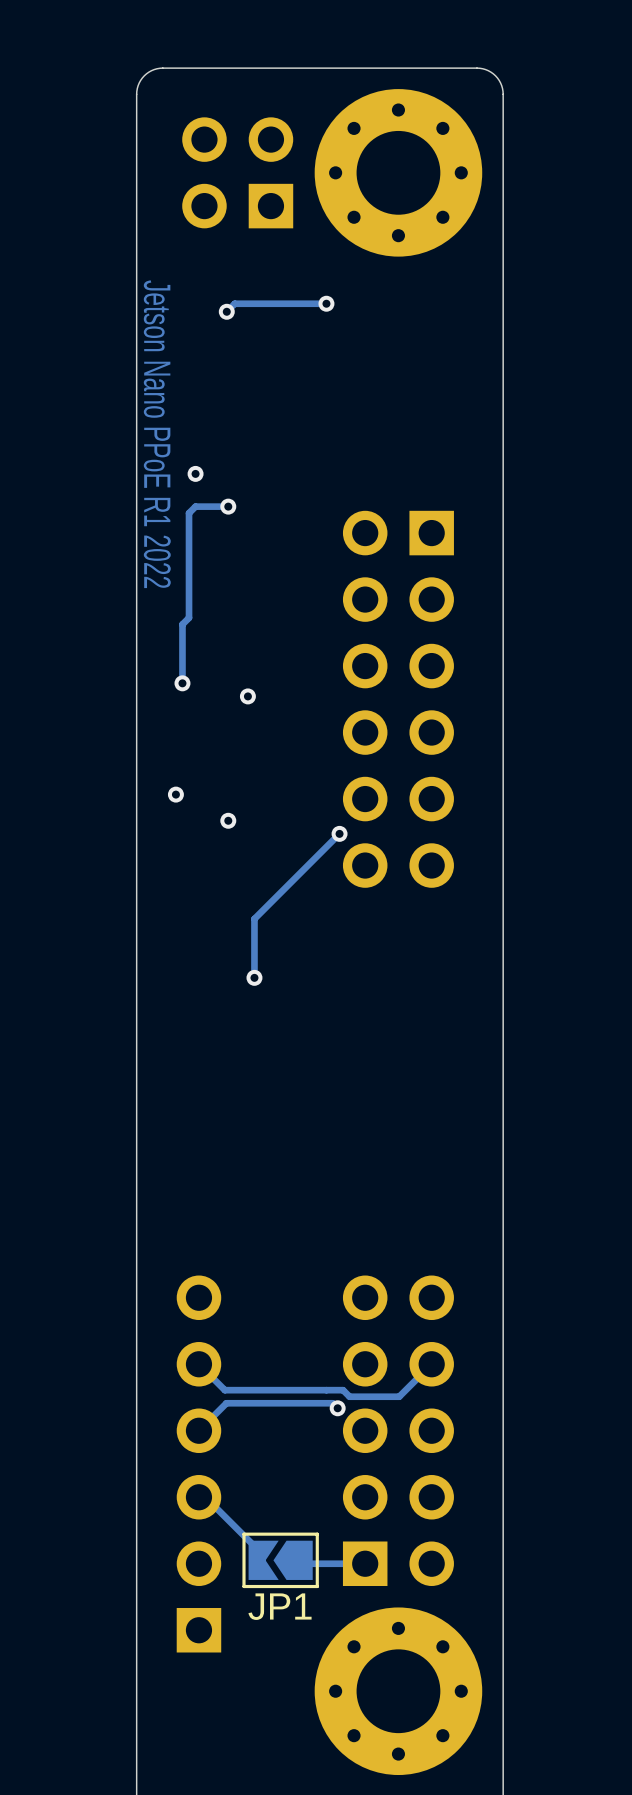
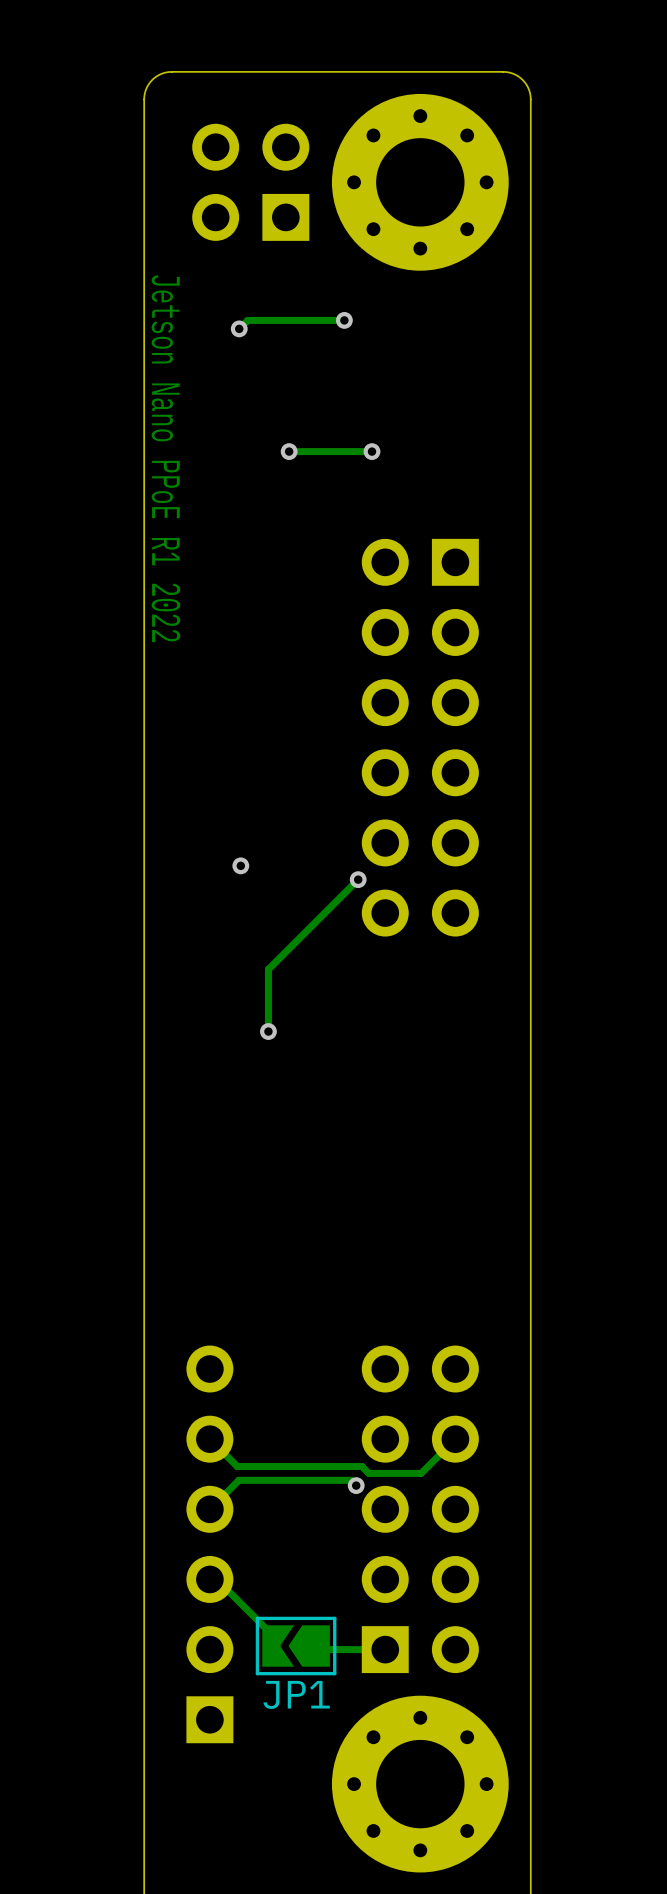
via: none -> (289, 451)
track: none -> (372, 451) (289, 451)
via: none -> (372, 451)
via: (195, 473) -> none
track: (228, 506) (195, 506) (189, 513) (189, 617) (182, 624) (182, 683) -> none
via: (228, 506) -> none
via: (182, 683) -> none
via: (247, 696) -> none
via: (175, 794) -> none

